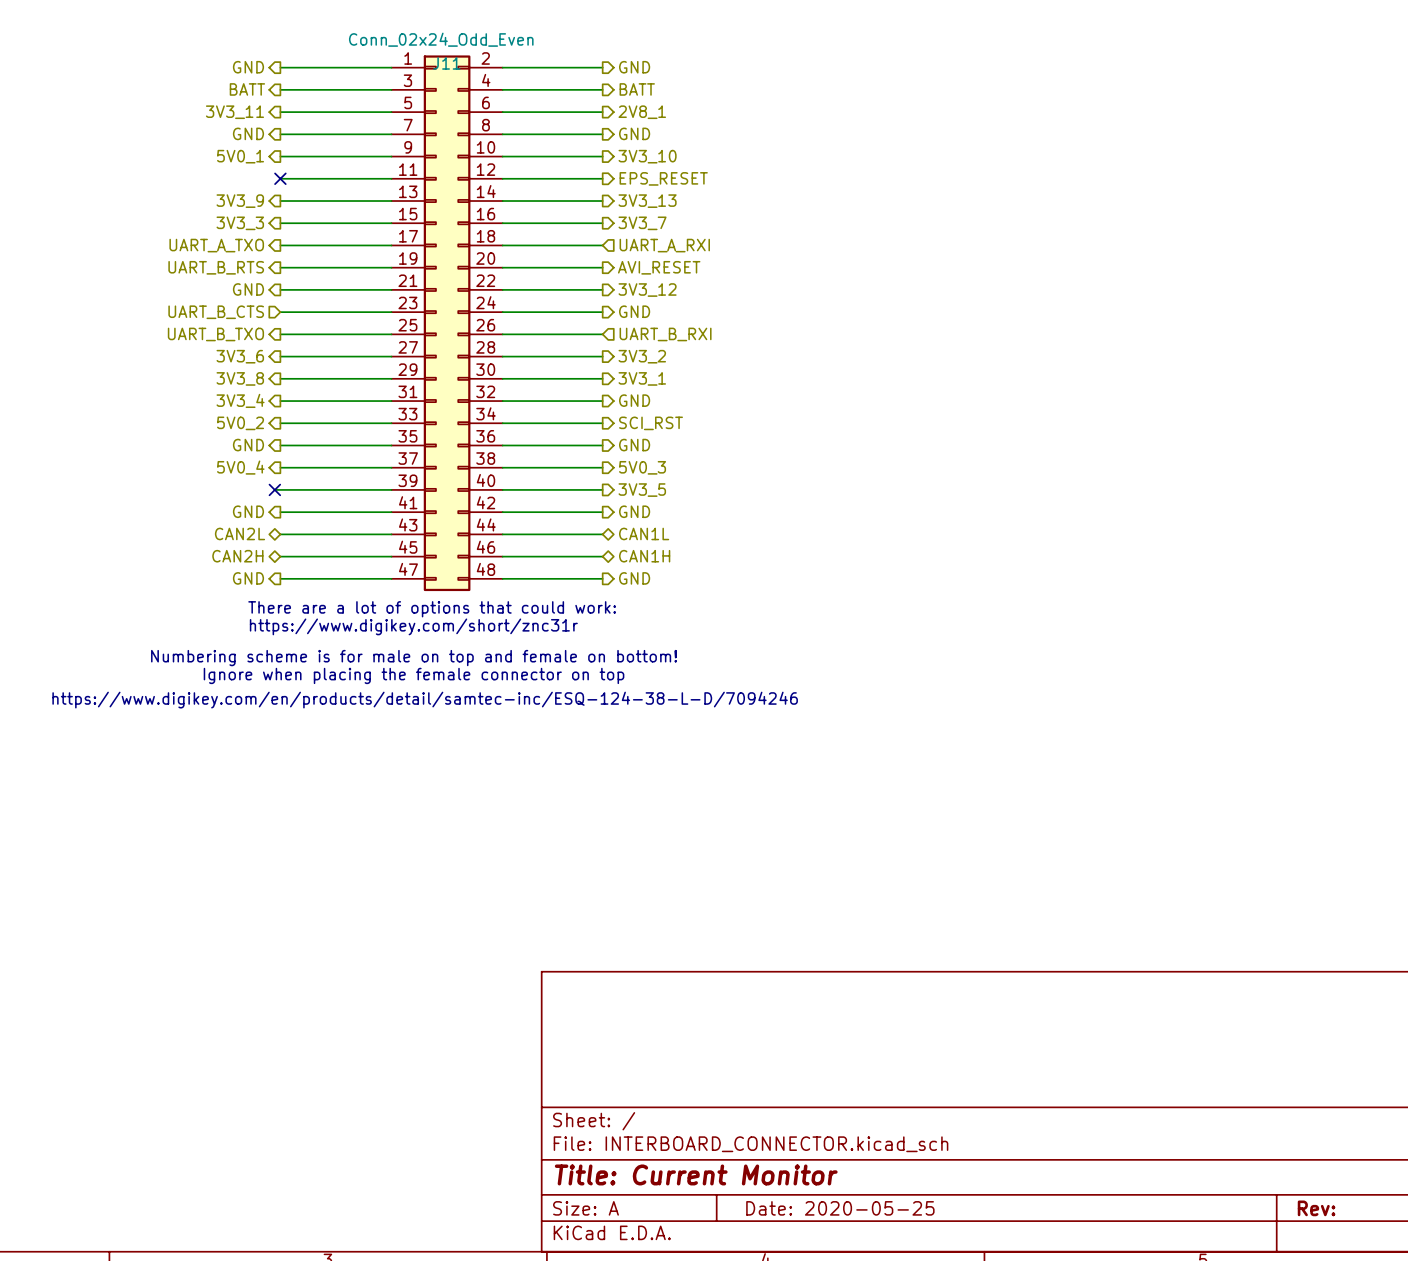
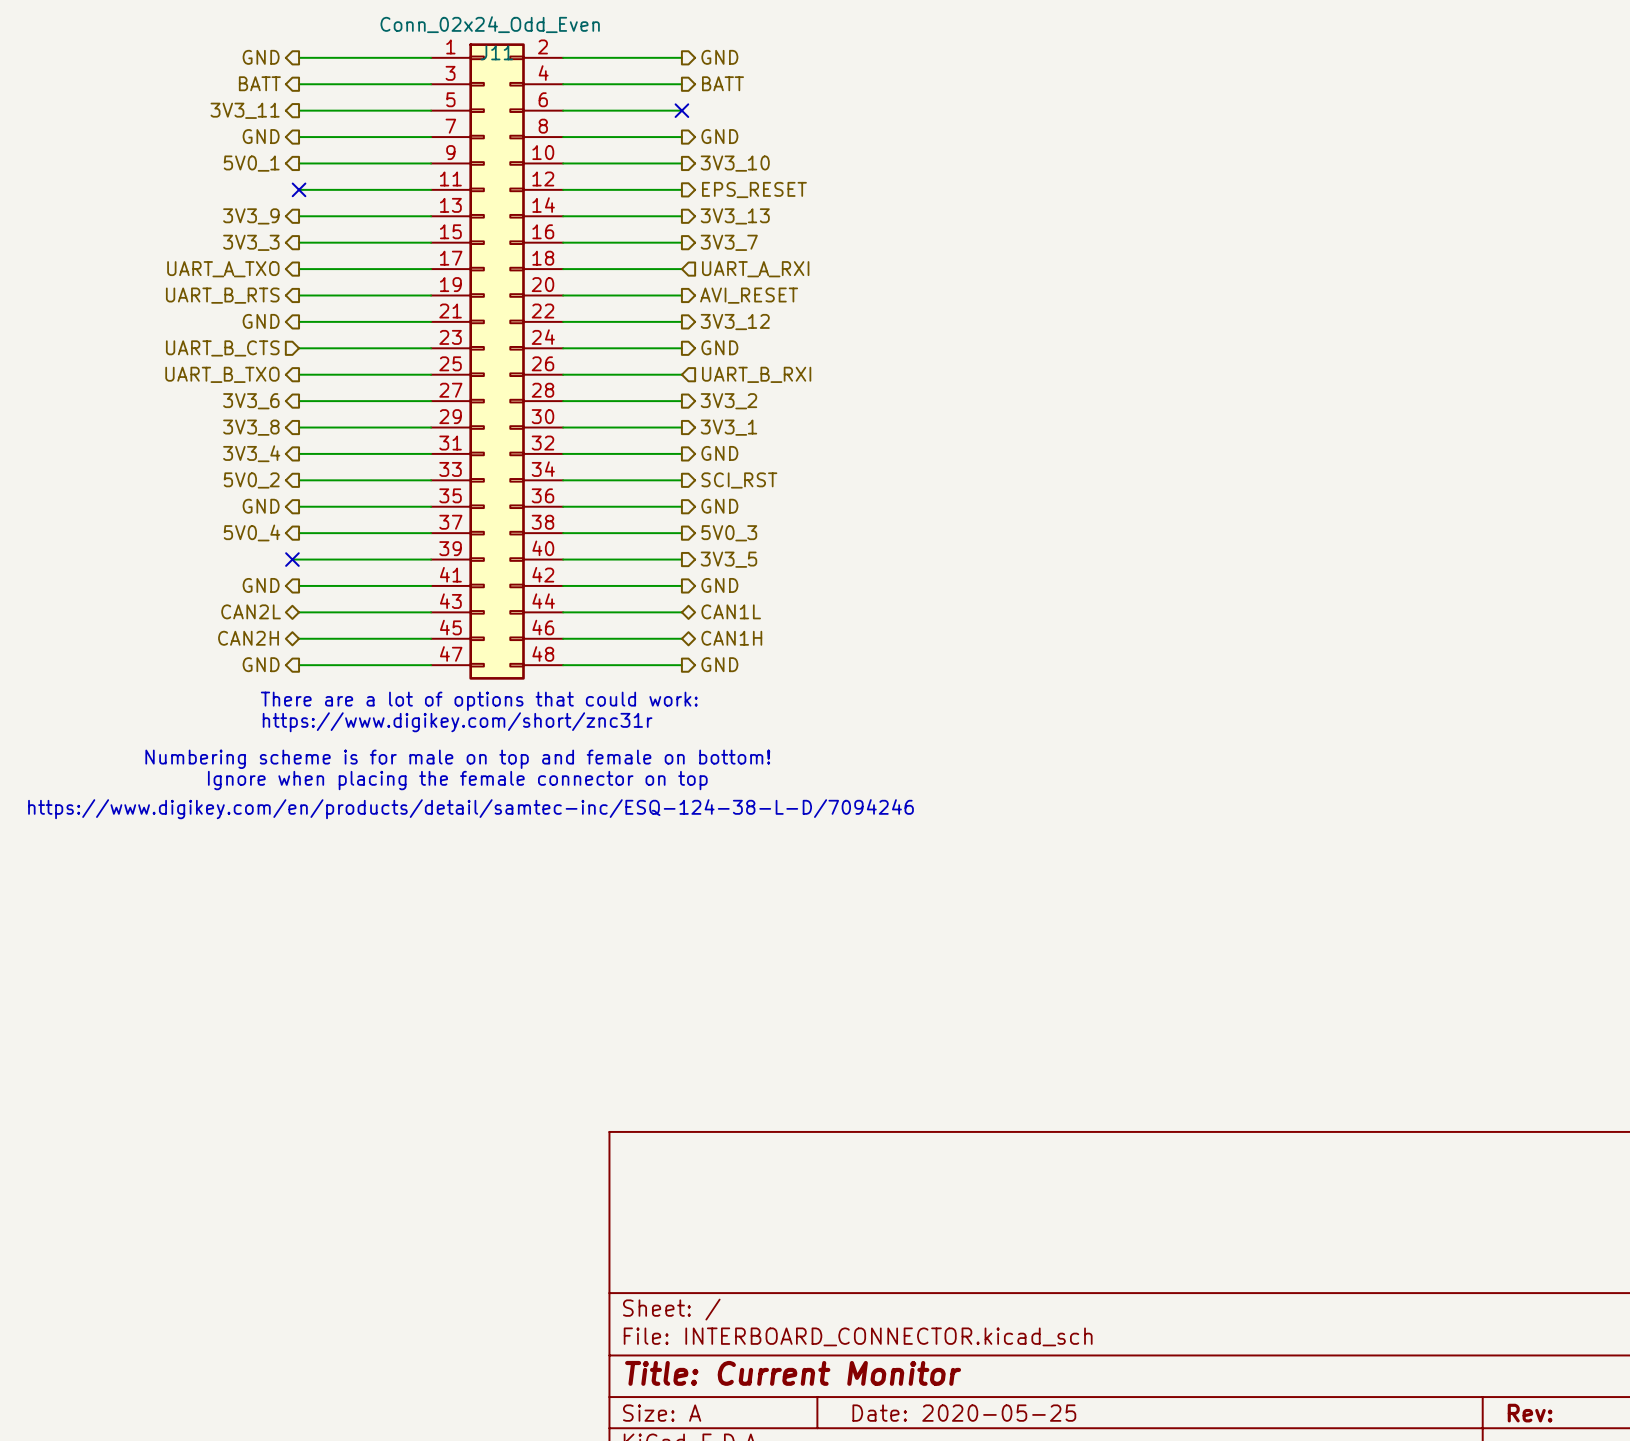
no-connect mark: none -> (681, 110)
hierarchical label: 2V8_1 (642, 112) -> none

